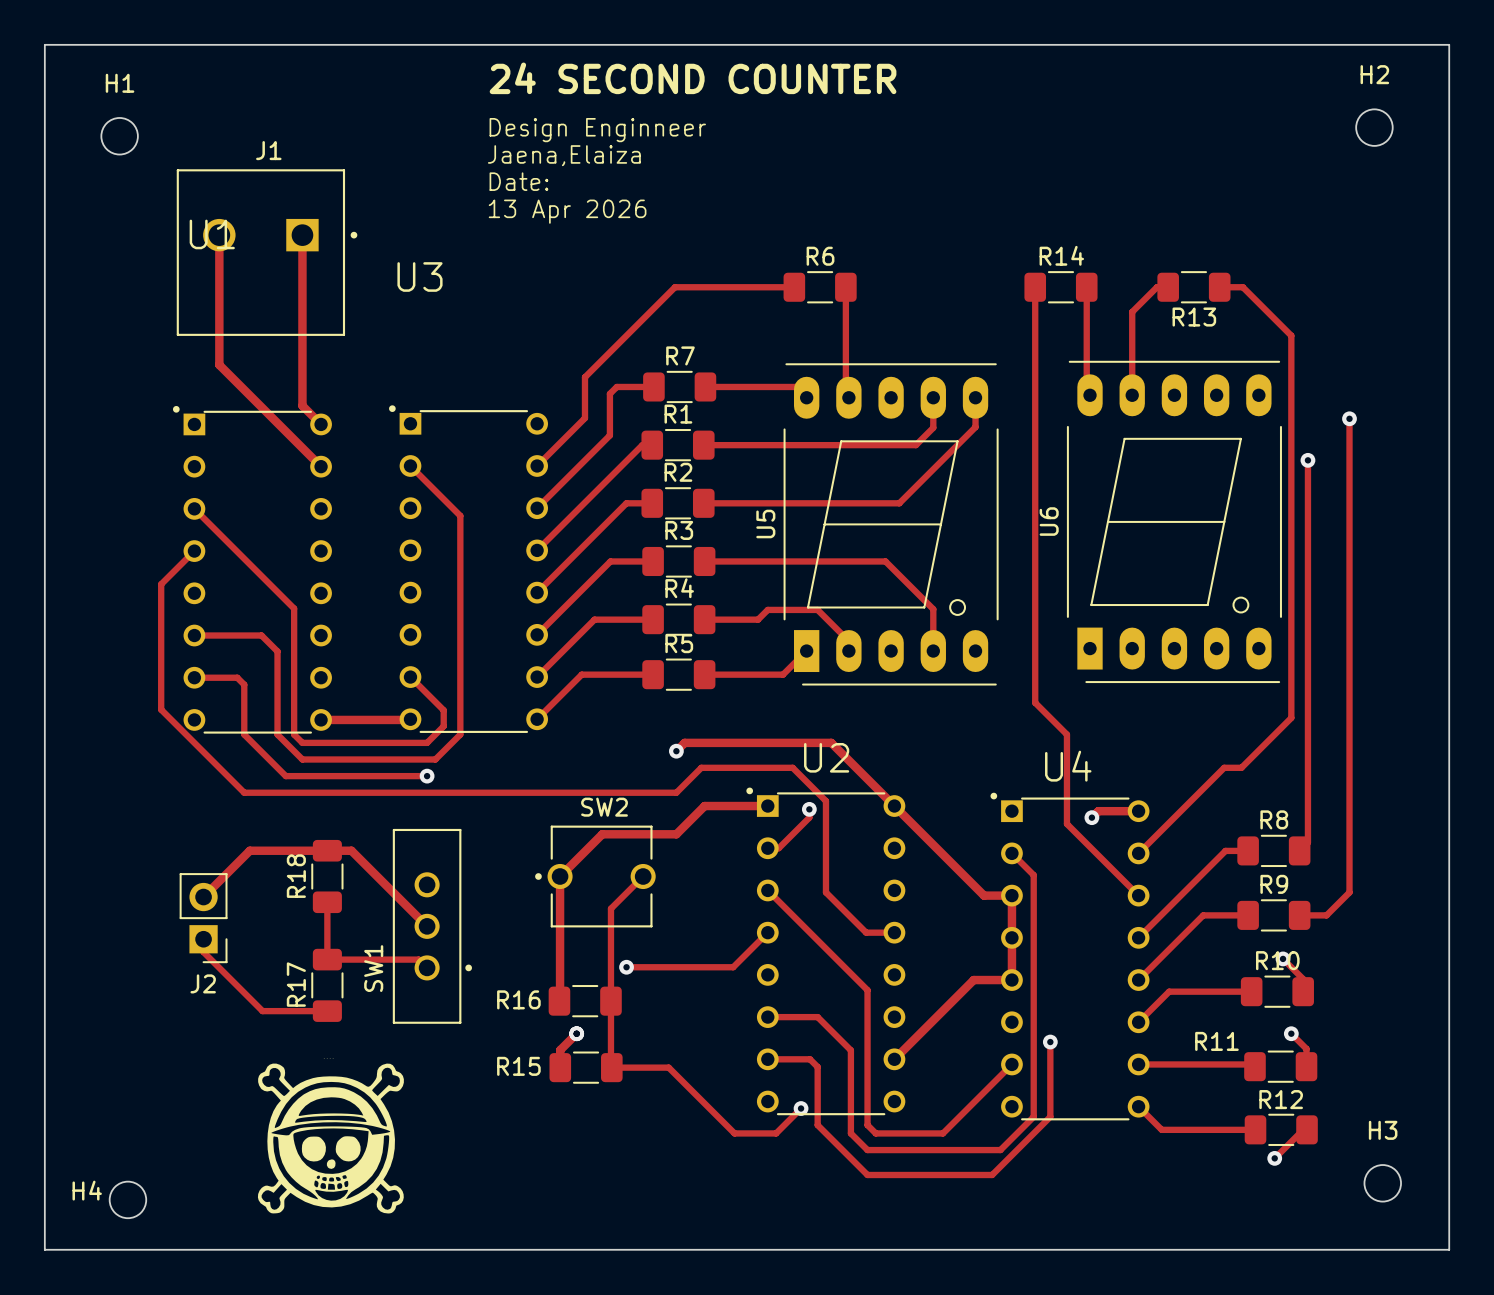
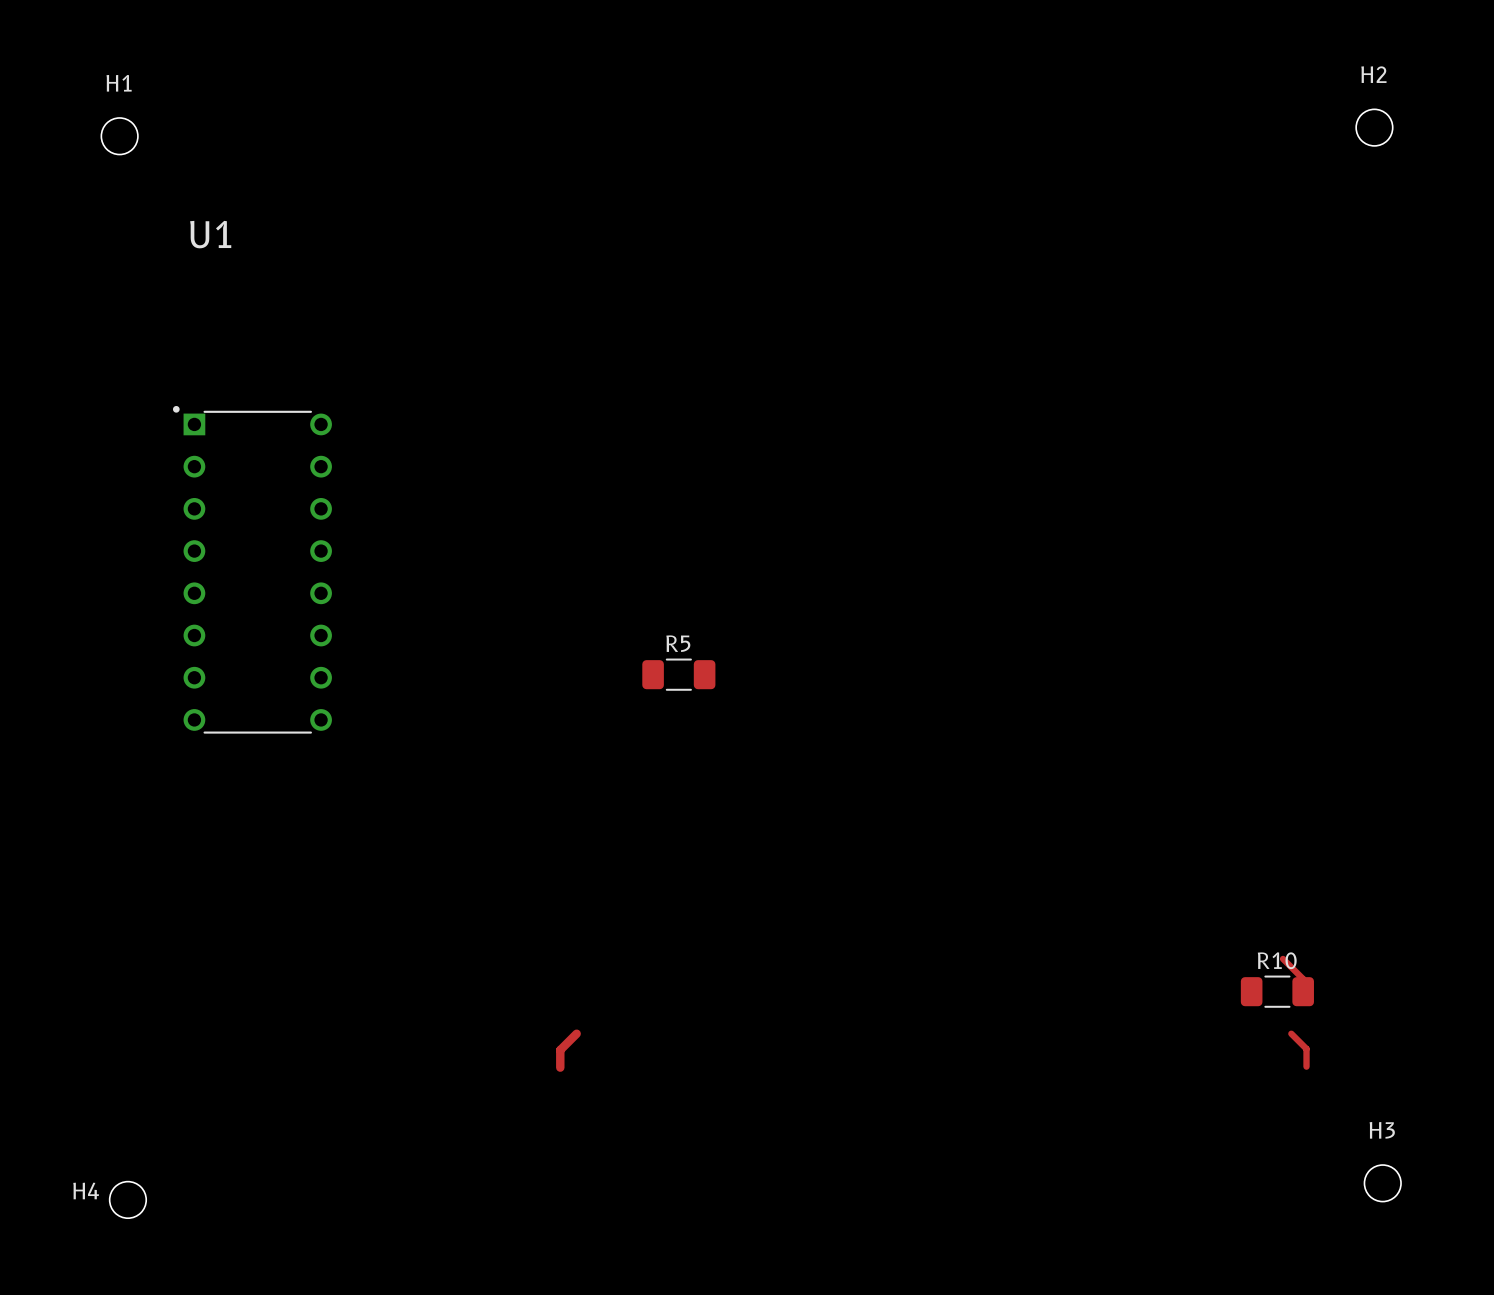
board edge: (44, 44) (1449, 44) (1449, 1249) (44, 1249) (44, 44) -> none
text: 24 SECOND COUNTER (693, 78) -> none
text: Design Enginneer (597, 130) -> none
text: Jaena,Elaiza (564, 155) -> none
text: Date: (518, 181) -> none
text: 13 Apr 2026 (567, 211) -> none
track: (219, 235) (219, 364) (321, 466) -> none
track: (302, 235) (302, 405) (321, 424) -> none
J1: (267, 252) -> none
track: (794, 287) (674, 287) (584, 377) (584, 418) (537, 465) -> none
R6: (820, 287) -> none
track: (845, 287) (845, 394) (848, 397) -> none
track: (1035, 287) (1035, 702) (1066, 734) (1066, 823) (1138, 895) -> none
R14: (1060, 287) -> none
track: (1086, 287) (1086, 392) (1090, 395) -> none
track: (1168, 287) (1156, 287) (1132, 311) (1132, 395) -> none
R13: (1193, 287) -> none
track: (1219, 287) (1242, 287) (1291, 335) (1291, 717) (1241, 767) (1224, 767) (1138, 853) -> none
track: (653, 386) (616, 386) (609, 393) (609, 435) (537, 508) -> none
R7: (679, 386) -> none
track: (705, 386) (795, 386) (806, 397) -> none
track: (933, 397) (933, 427) (915, 445) (703, 445) -> none
track: (975, 397) (975, 427) (899, 503) (703, 503) -> none
track: (1349, 418) (1349, 892) (1326, 915) (1299, 915) -> none
via: (1349, 418) -> none
track: (652, 445) (642, 445) (537, 550) -> none
R1: (678, 445) -> none
track: (1307, 460) (1307, 842) (1299, 850) -> none
via: (1307, 460) -> none
track: (410, 465) (460, 515) (460, 734) (435, 759) (302, 759) (277, 734) (277, 651) (261, 635) (194, 635) -> none
track: (652, 503) (626, 503) (537, 592) -> none
R2: (678, 503) -> none
track: (194, 508) (294, 608) (294, 734) (302, 742) (427, 742) (443, 726) (443, 710) (410, 677) -> none
U6: (1174, 521) -> none
U5: (891, 524) -> none
track: (194, 551) (161, 584) (161, 709) (244, 792) (676, 792) (701, 767) (792, 767) (825, 801) (825, 892) (866, 932) (894, 932) -> none
track: (653, 561) (610, 561) (537, 634) -> none
R3: (678, 561) -> none
track: (704, 561) (885, 561) (933, 609) (933, 651) -> none
U3: (468, 569) -> none
track: (653, 619) (594, 619) (537, 677) -> none
R4: (678, 619) -> none
track: (704, 619) (758, 619) (767, 609) (817, 609) (848, 641) (848, 651) -> none
track: (806, 651) (783, 674) (704, 674) -> none
track: (653, 674) (581, 674) (537, 719) -> none
track: (194, 677) (237, 677) (244, 684) (244, 734) (285, 776) (427, 776) -> none
track: (410, 719) (321, 719) -> none
track: (676, 751) (684, 742) (831, 742) (984, 895) (1011, 895) (1011, 980) (973, 980) (894, 1059) -> none
via: (676, 751) -> none
via: (427, 776) -> none
track: (767, 806) (704, 806) (676, 834) (602, 834) (560, 876) (559, 1001) -> none
track: (809, 809) (809, 817) (778, 848) (767, 848) -> none
via: (809, 809) -> none
track: (1138, 811) (1098, 811) (1091, 817) -> none
via: (1091, 817) -> none
track: (1248, 850) (1225, 850) (1138, 937) -> none
R8: (1273, 850) -> none
track: (1011, 853) (1033, 875) (1033, 1116) (1000, 1150) (867, 1150) (850, 1133) (850, 1050) (817, 1017) (767, 1017) -> none
R18: (327, 876) -> none
SW2: (595, 876) -> none
track: (643, 876) (610, 908) (610, 1066) (668, 1067) (734, 1133) (776, 1133) (801, 1108) -> none
track: (767, 890) (867, 990) (867, 1125) (875, 1133) (942, 1133) (1011, 1064) -> none
track: (203, 897) (249, 850) (351, 850) (427, 926) -> none
track: (327, 902) (327, 959) (418, 959) (427, 967) -> none
track: (1248, 915) (1203, 915) (1138, 980) -> none
R9: (1273, 915) -> none
J2: (203, 918) -> none
SW1: (432, 926) -> none
track: (767, 932) (733, 967) (626, 967) -> none
track: (203, 939) (203, 952) (262, 1011) (327, 1011) -> none
U2: (825, 951) -> none
U4: (1069, 956) -> none
via: (1283, 958) -> none
via: (626, 967) -> none
R17: (327, 985) -> none
track: (1251, 991) (1169, 991) (1138, 1022) -> none
R16: (585, 1001) -> none
via: (576, 1033) -> none
via: (1291, 1033) -> none
track: (1050, 1042) (1050, 1116) (992, 1174) (867, 1174) (817, 1125) (817, 1066) (810, 1059) (767, 1059) -> none
via: (1050, 1042) -> none
drawing: [257, 1058, 404, 1214] -> none
track: (1138, 1064) (1252, 1064) (1254, 1066) -> none
R11: (1280, 1066) -> none
R15: (586, 1067) -> none
track: (1138, 1106) (1161, 1129) (1255, 1129) -> none
via: (801, 1108) -> none
R12: (1281, 1129) -> none
track: (1307, 1129) (1303, 1129) (1274, 1158) -> none
via: (1274, 1158) -> none

